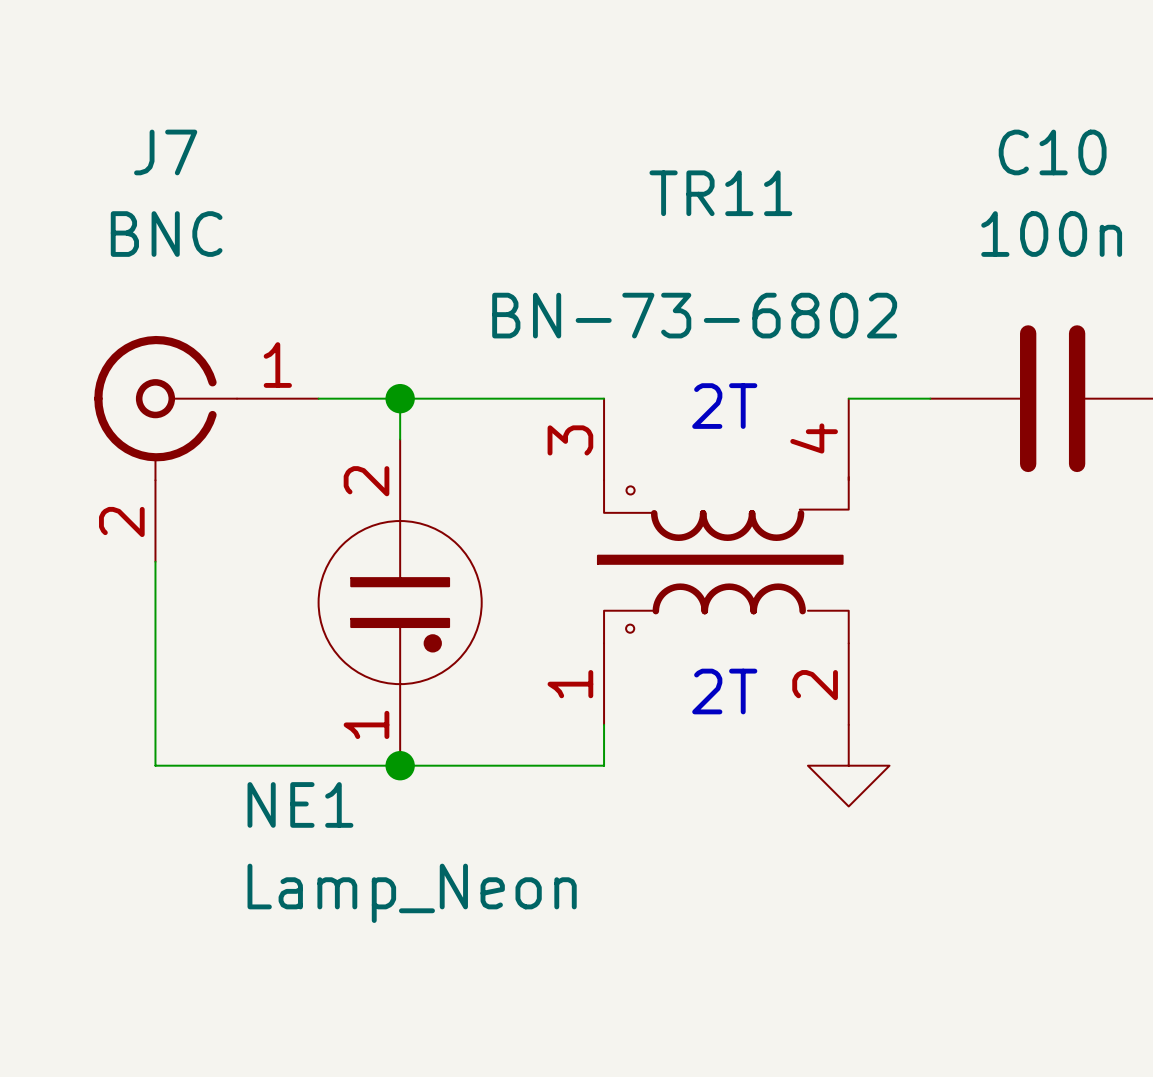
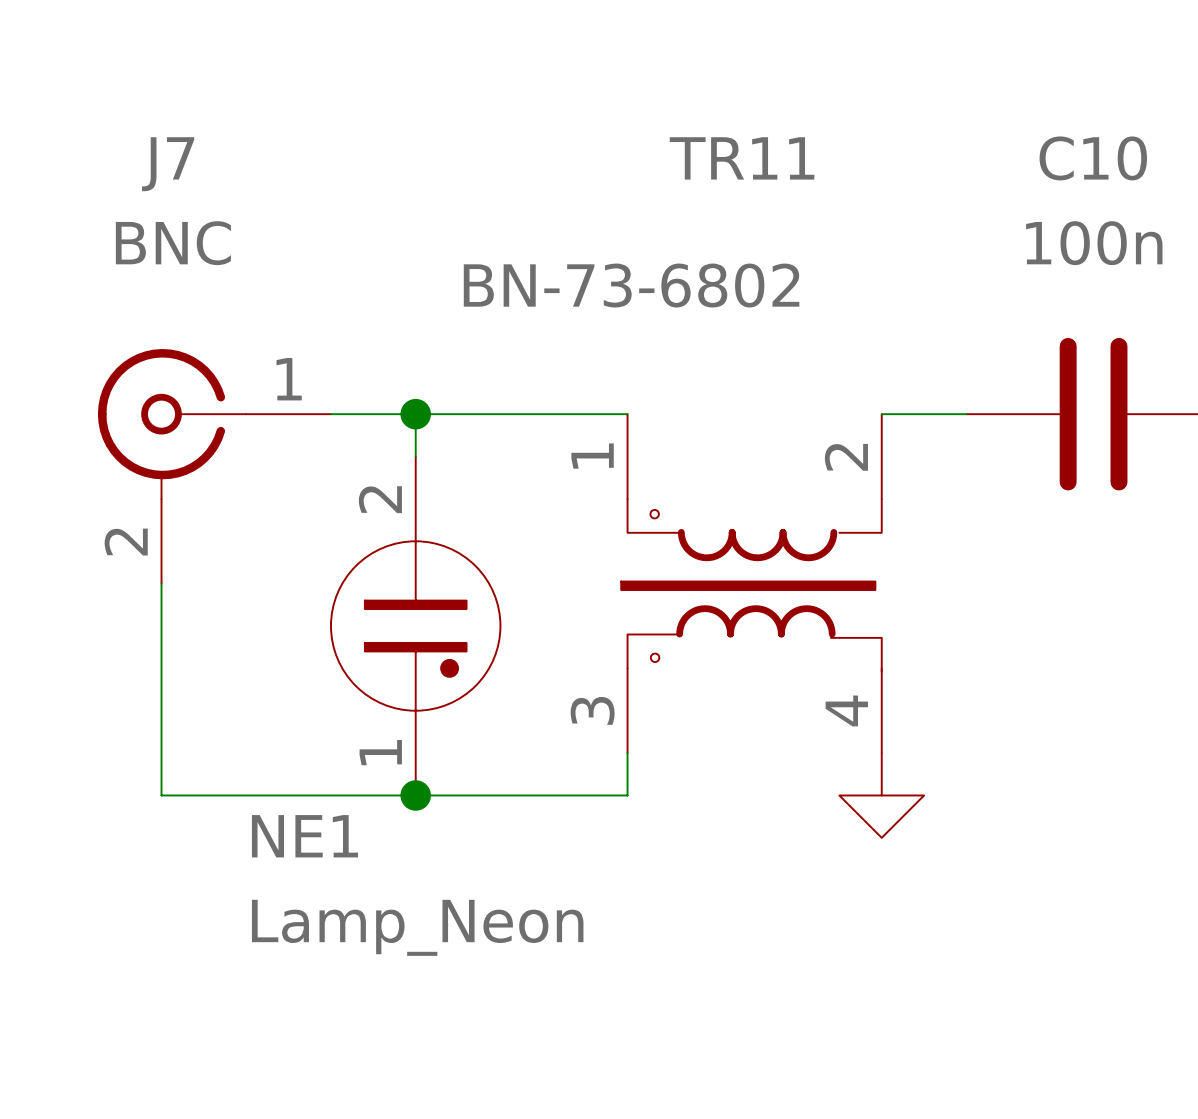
text: 2T (724, 406) -> none
TR11 flip: as is (723, 560) -> up-down (751, 585)
text: 2T (724, 691) -> none

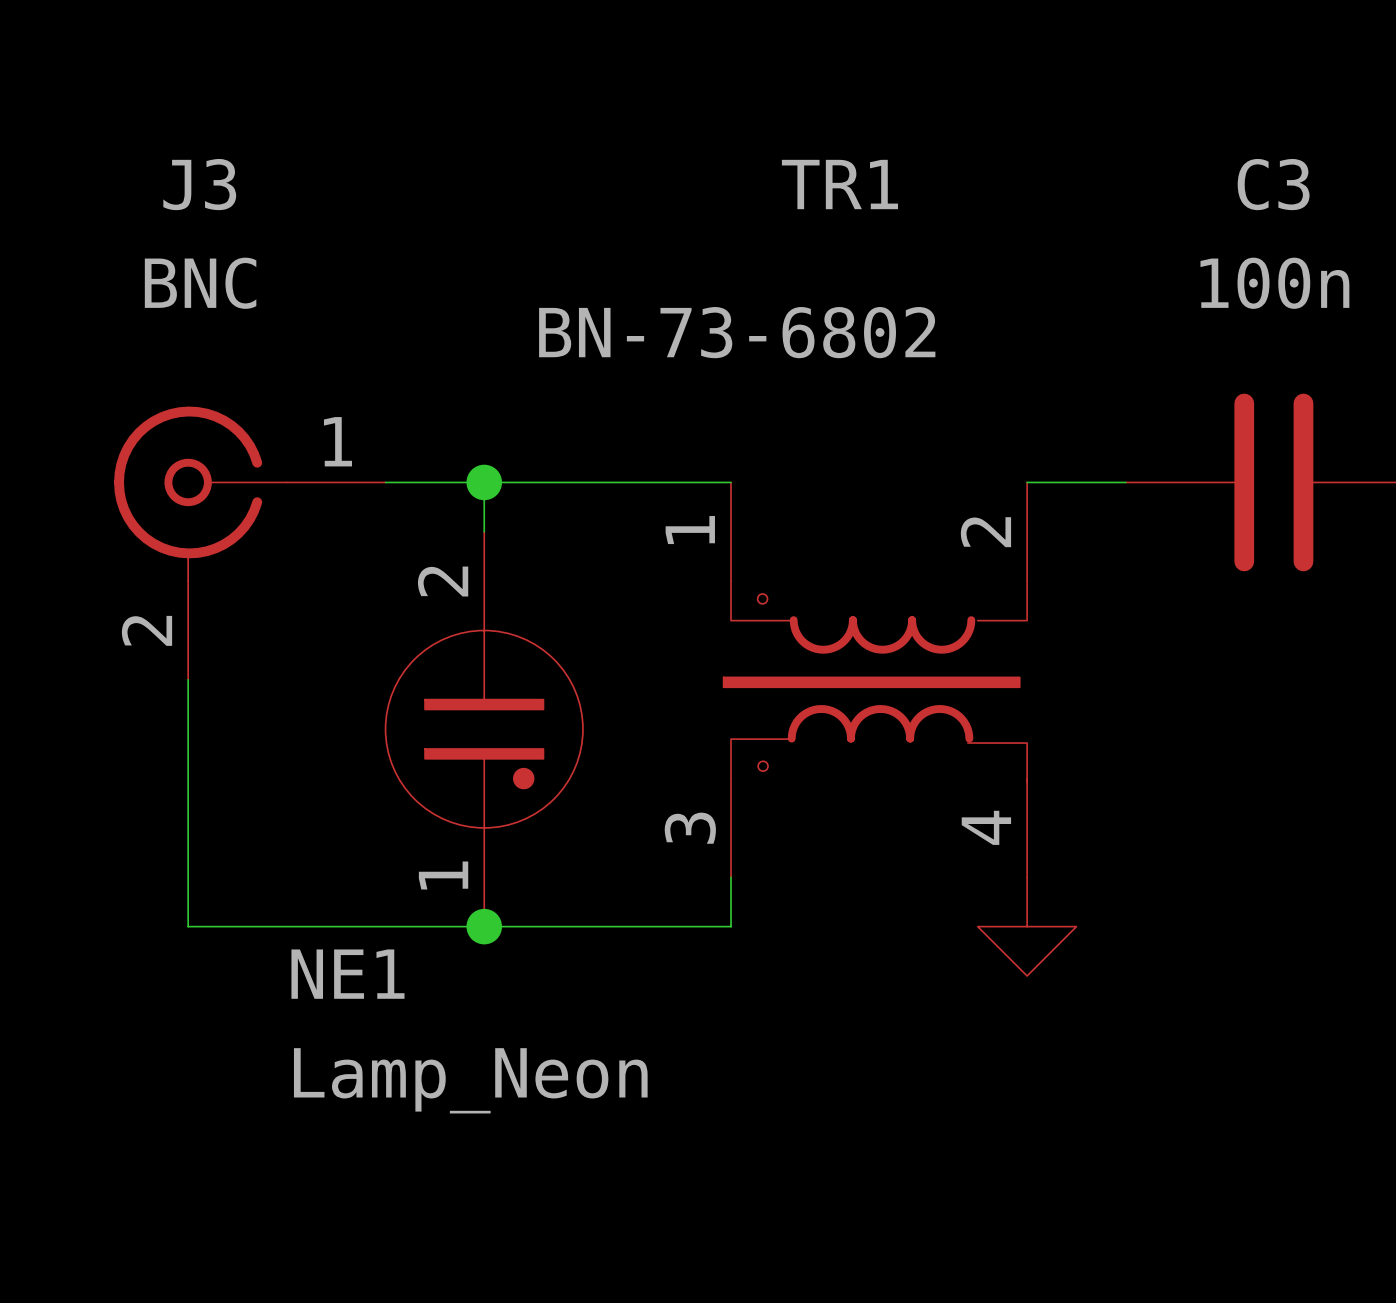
TR11 name: TR11 (742, 158) -> TR1 (839, 184)
C10 name: C10 (1093, 158) -> C3 (1273, 184)
J7 name: J7 (168, 164) -> J3 (199, 184)

